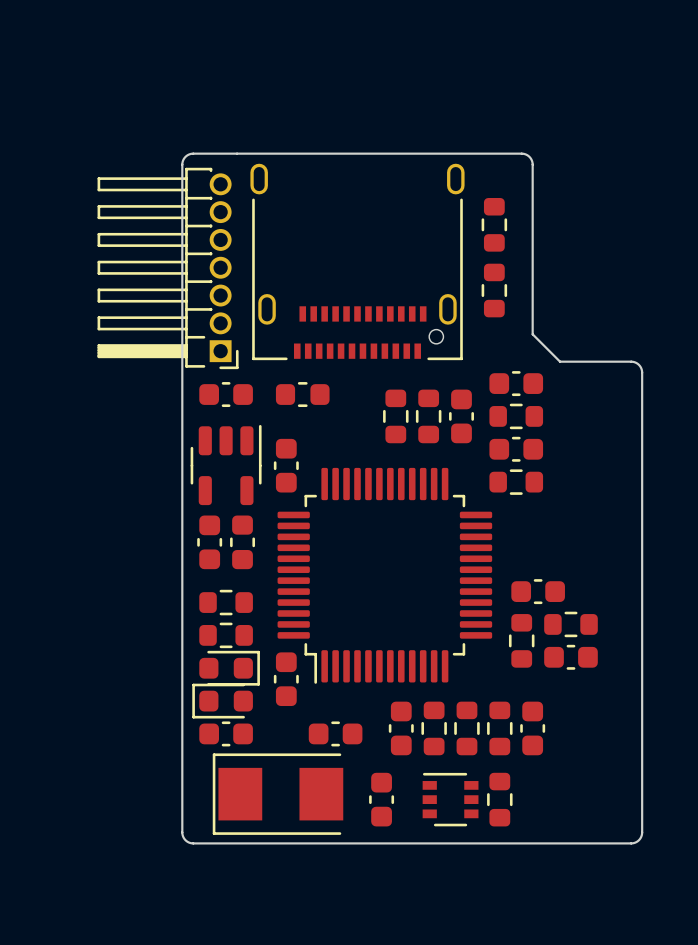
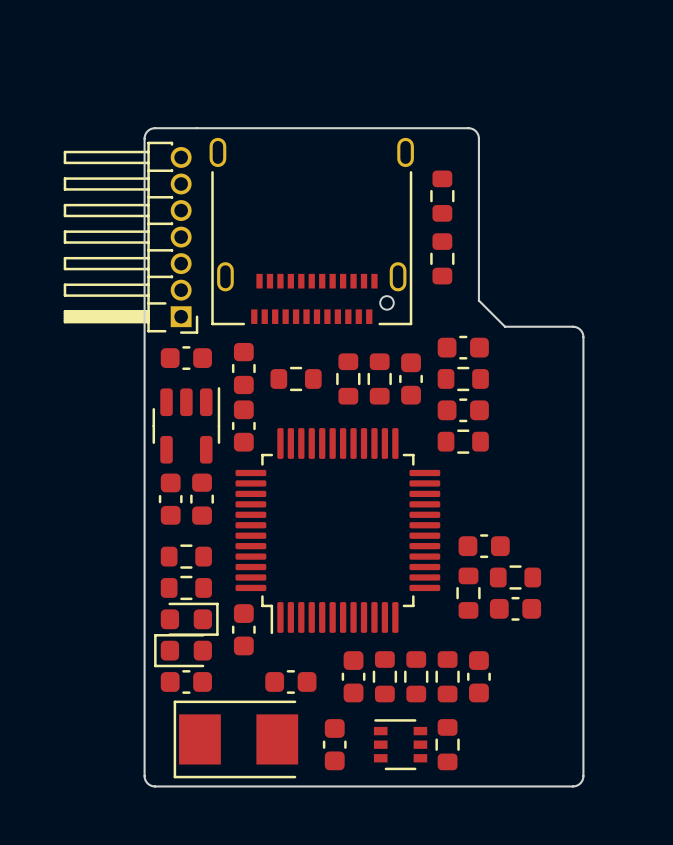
part rotation: 0° (302, 394) -> 90° clockwise (243, 368)
part: none -> (296, 378)

